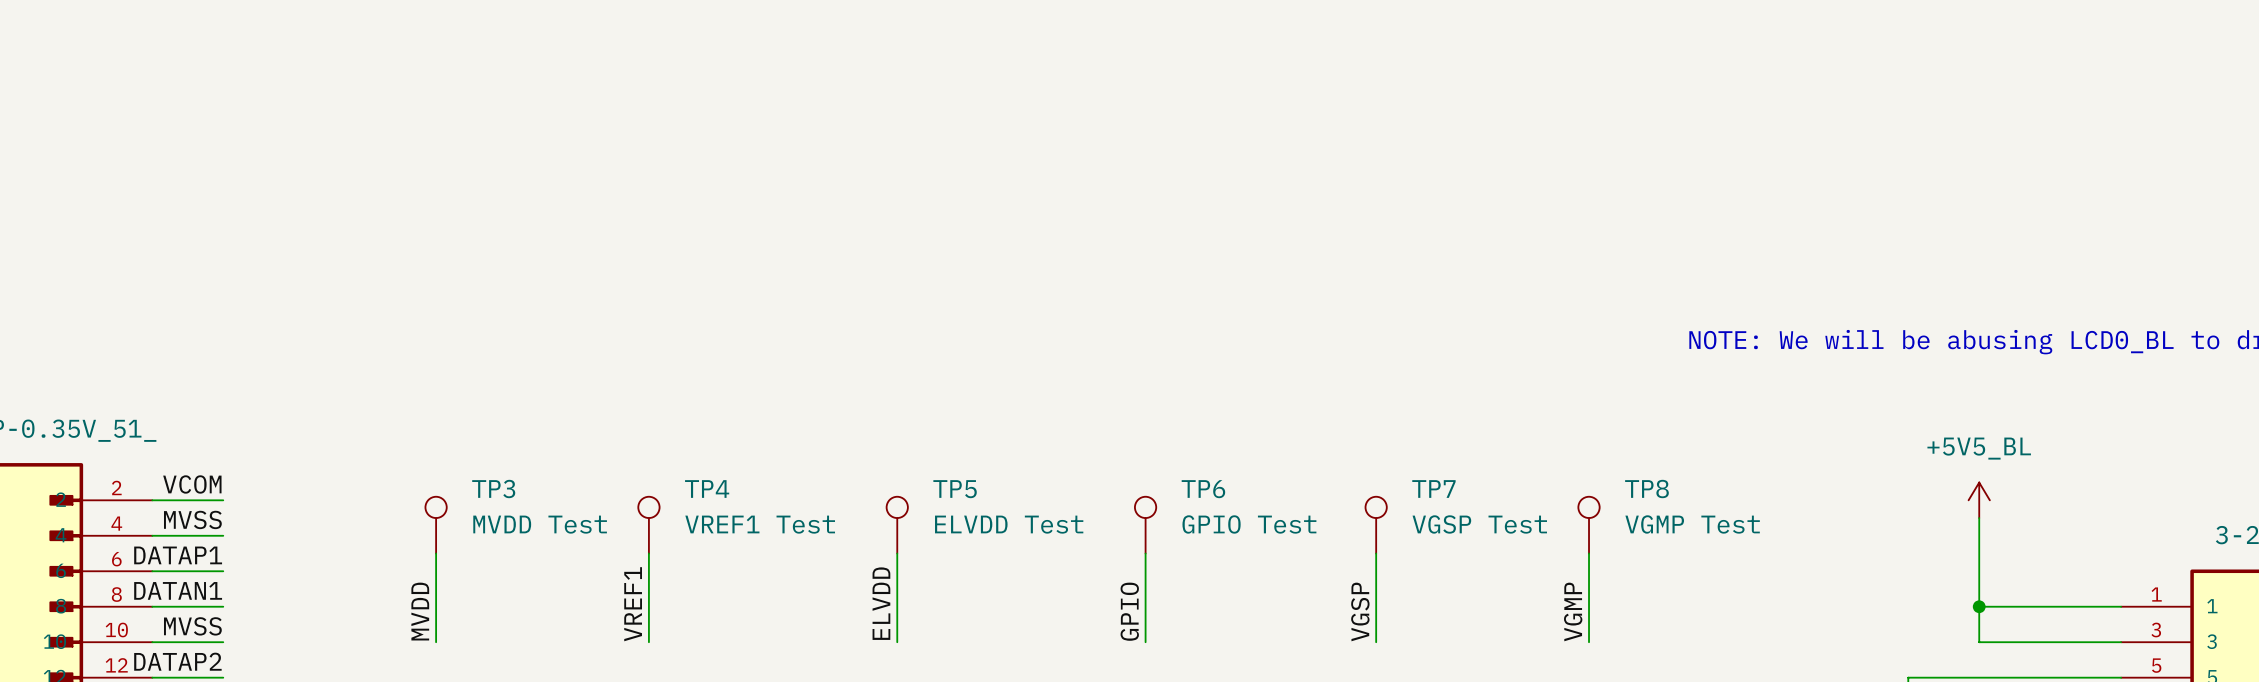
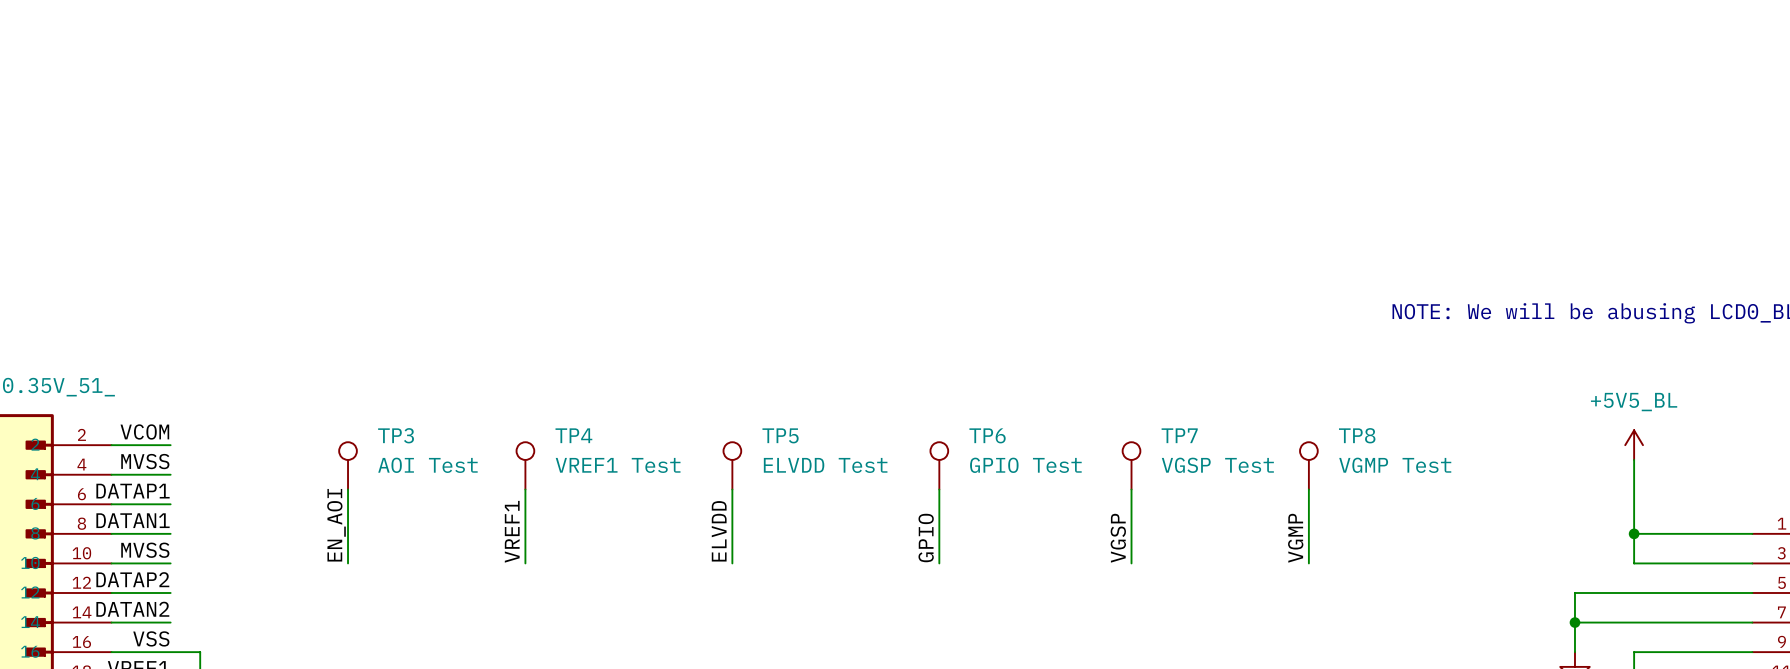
TP3 value: MVDD Test (540, 524) -> AOI Test (427, 465)
label: MVDD (420, 611) -> EN_AOI (336, 525)

